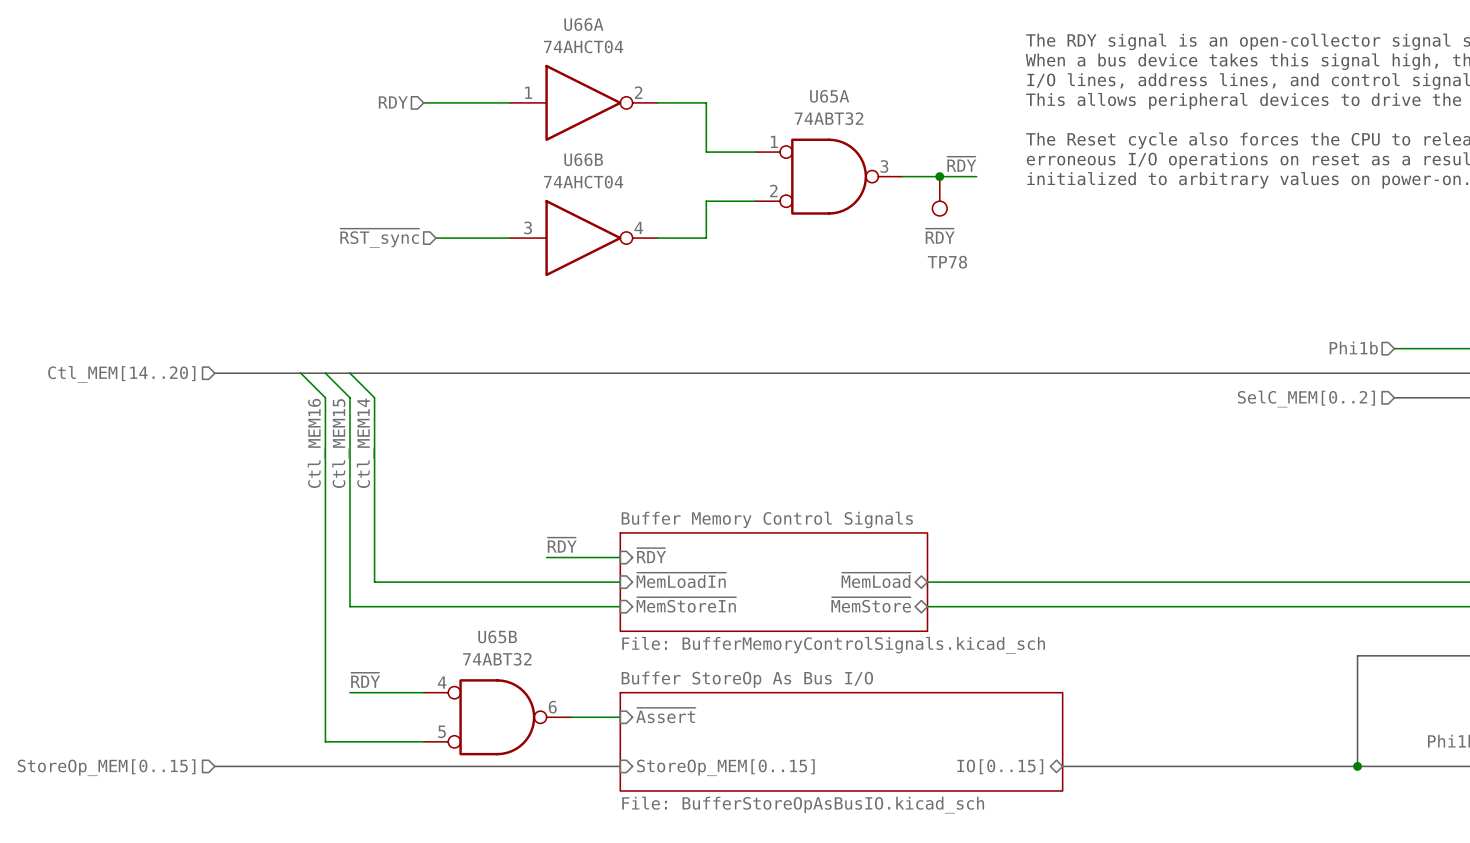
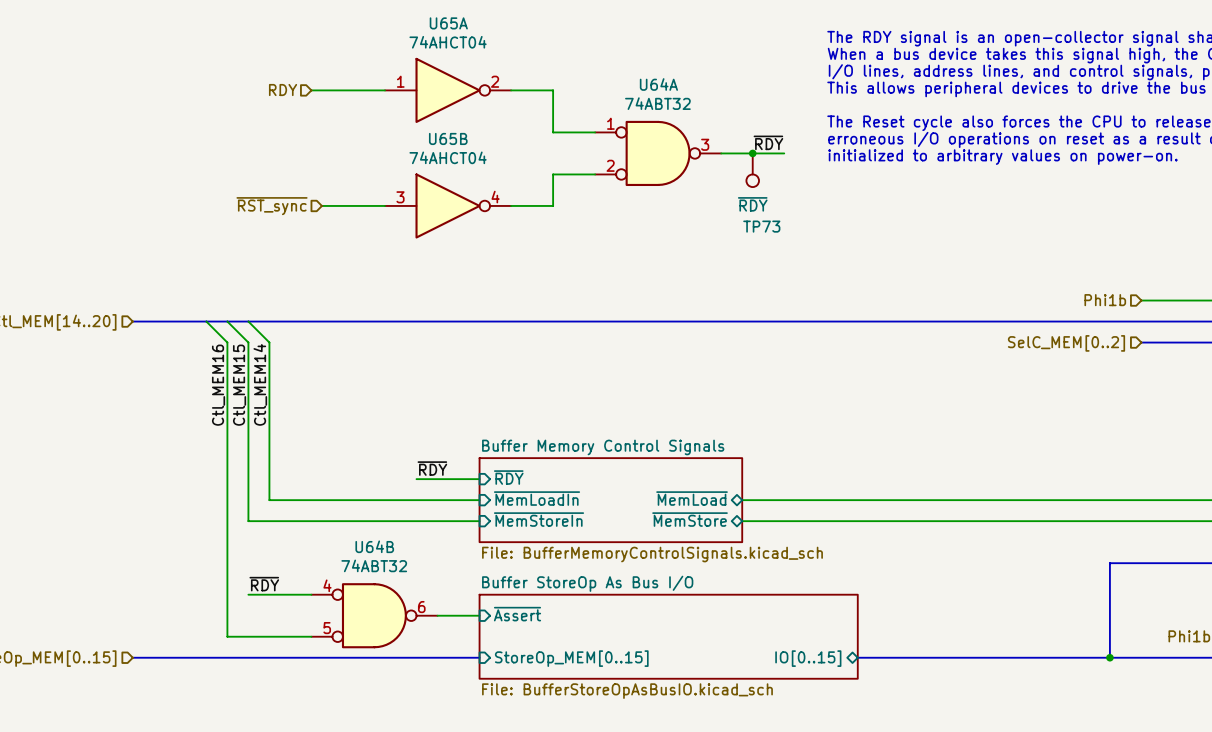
U66A name: U66A (583, 24) -> U65A (448, 23)
U65A name: U65A (829, 96) -> U64A (658, 84)
U66B name: U66B (583, 159) -> U65B (448, 138)
TP78 name: TP78 (947, 262) -> TP73 (761, 226)
U65B name: U65B (497, 636) -> U64B (374, 546)

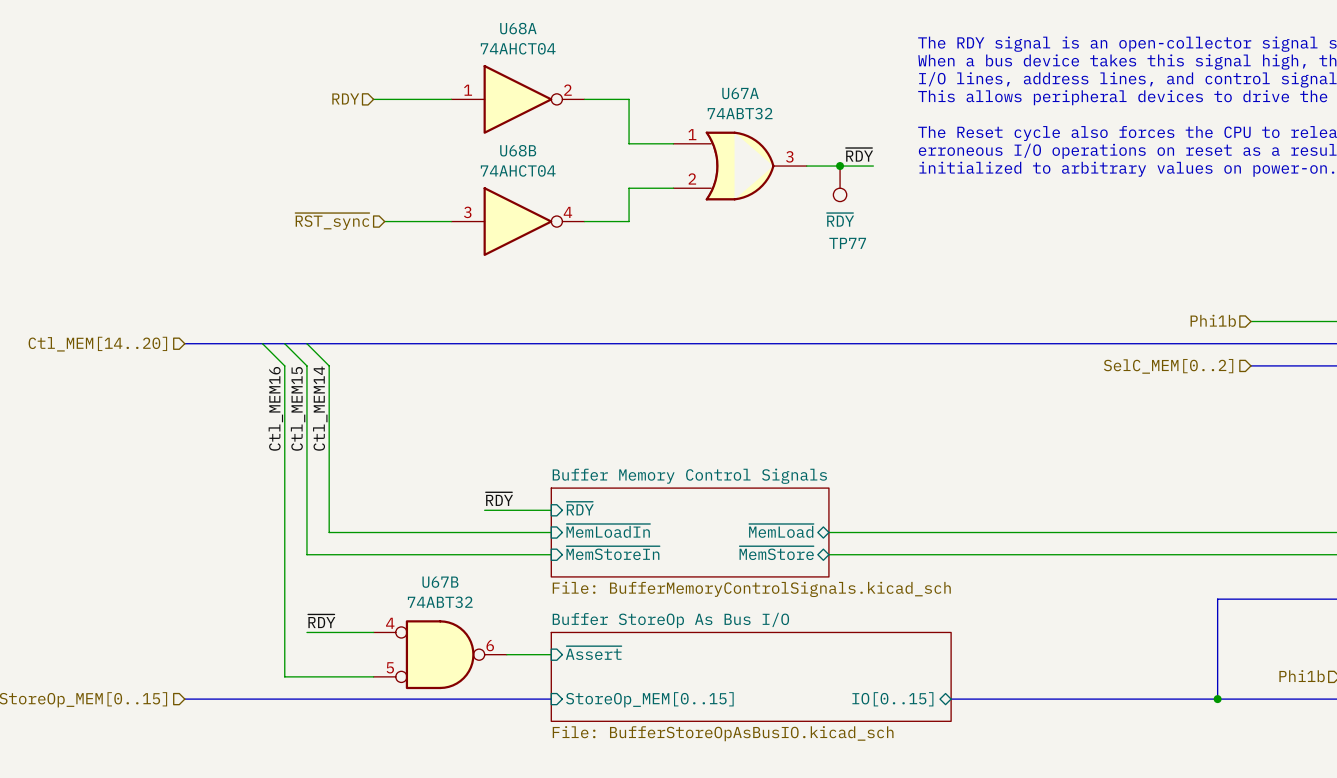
U65A name: U65A (448, 23) -> U68A (518, 28)
U65B name: U65B (448, 138) -> U68B (518, 150)
U64A: 74ABT32 (658, 153) -> none
U67A: none -> 74ABT32 (740, 166)
TP73 name: TP73 (761, 226) -> TP77 (847, 243)
U64B name: U64B (374, 546) -> U67B (440, 582)

